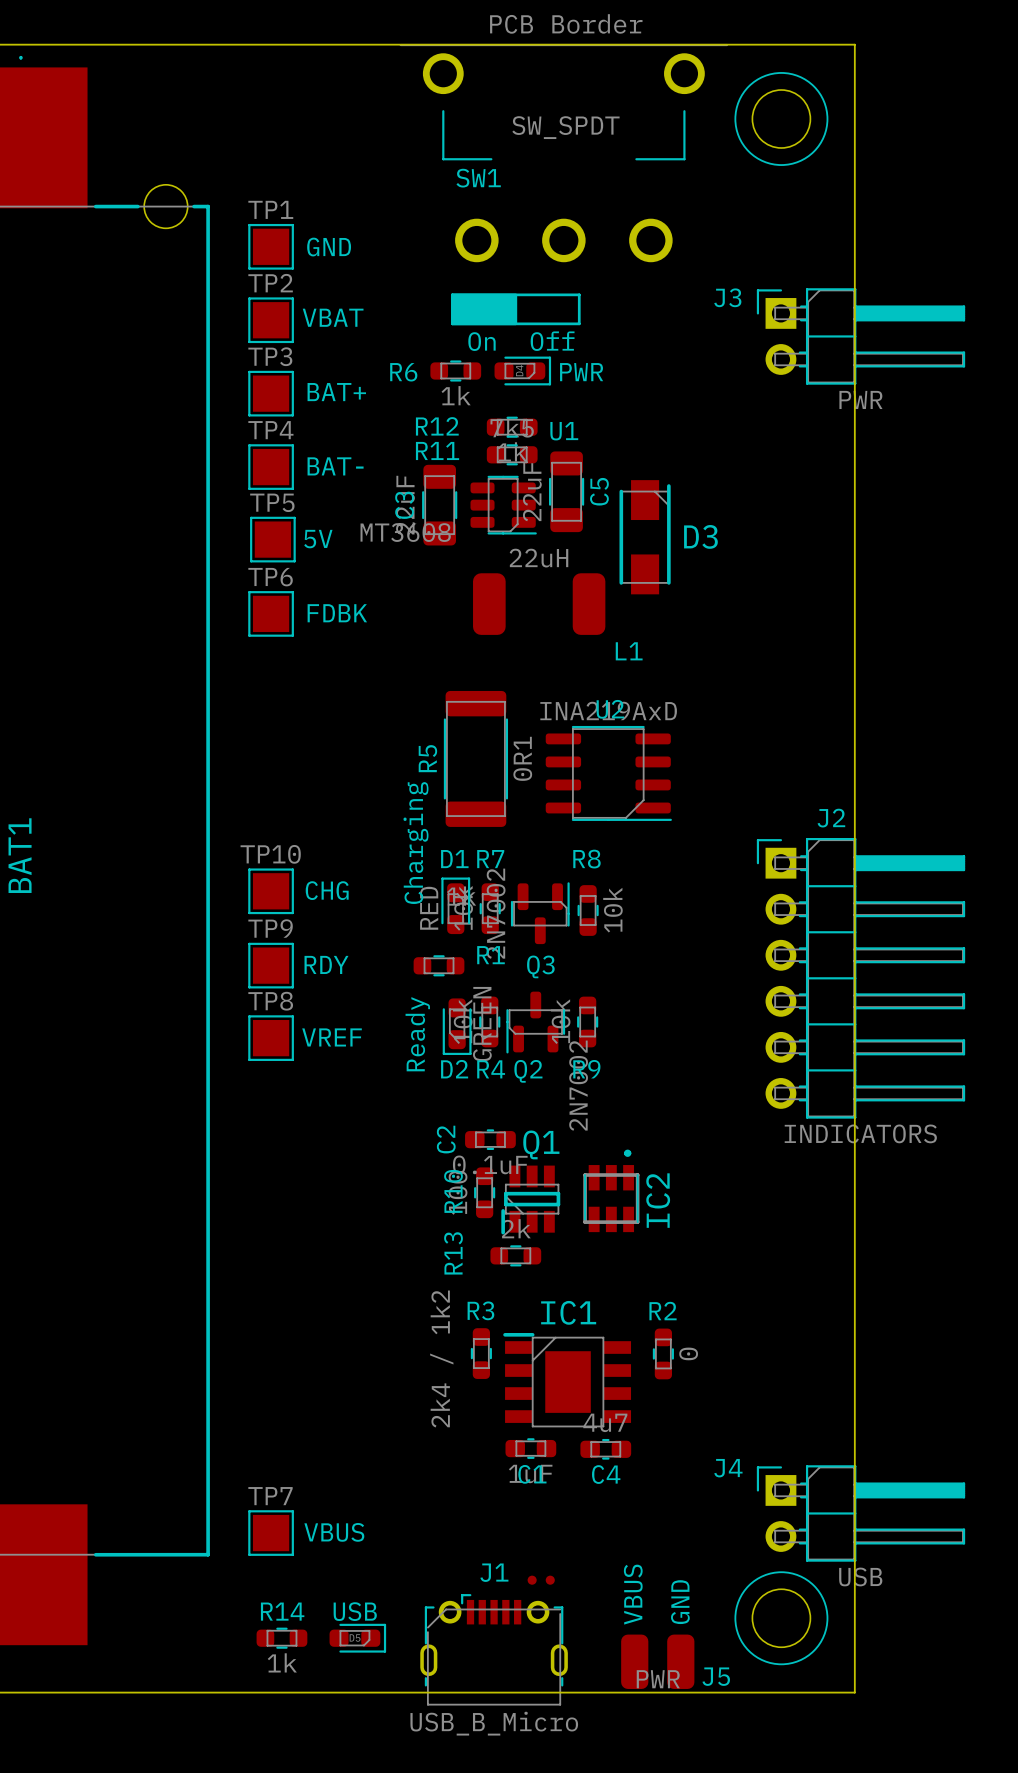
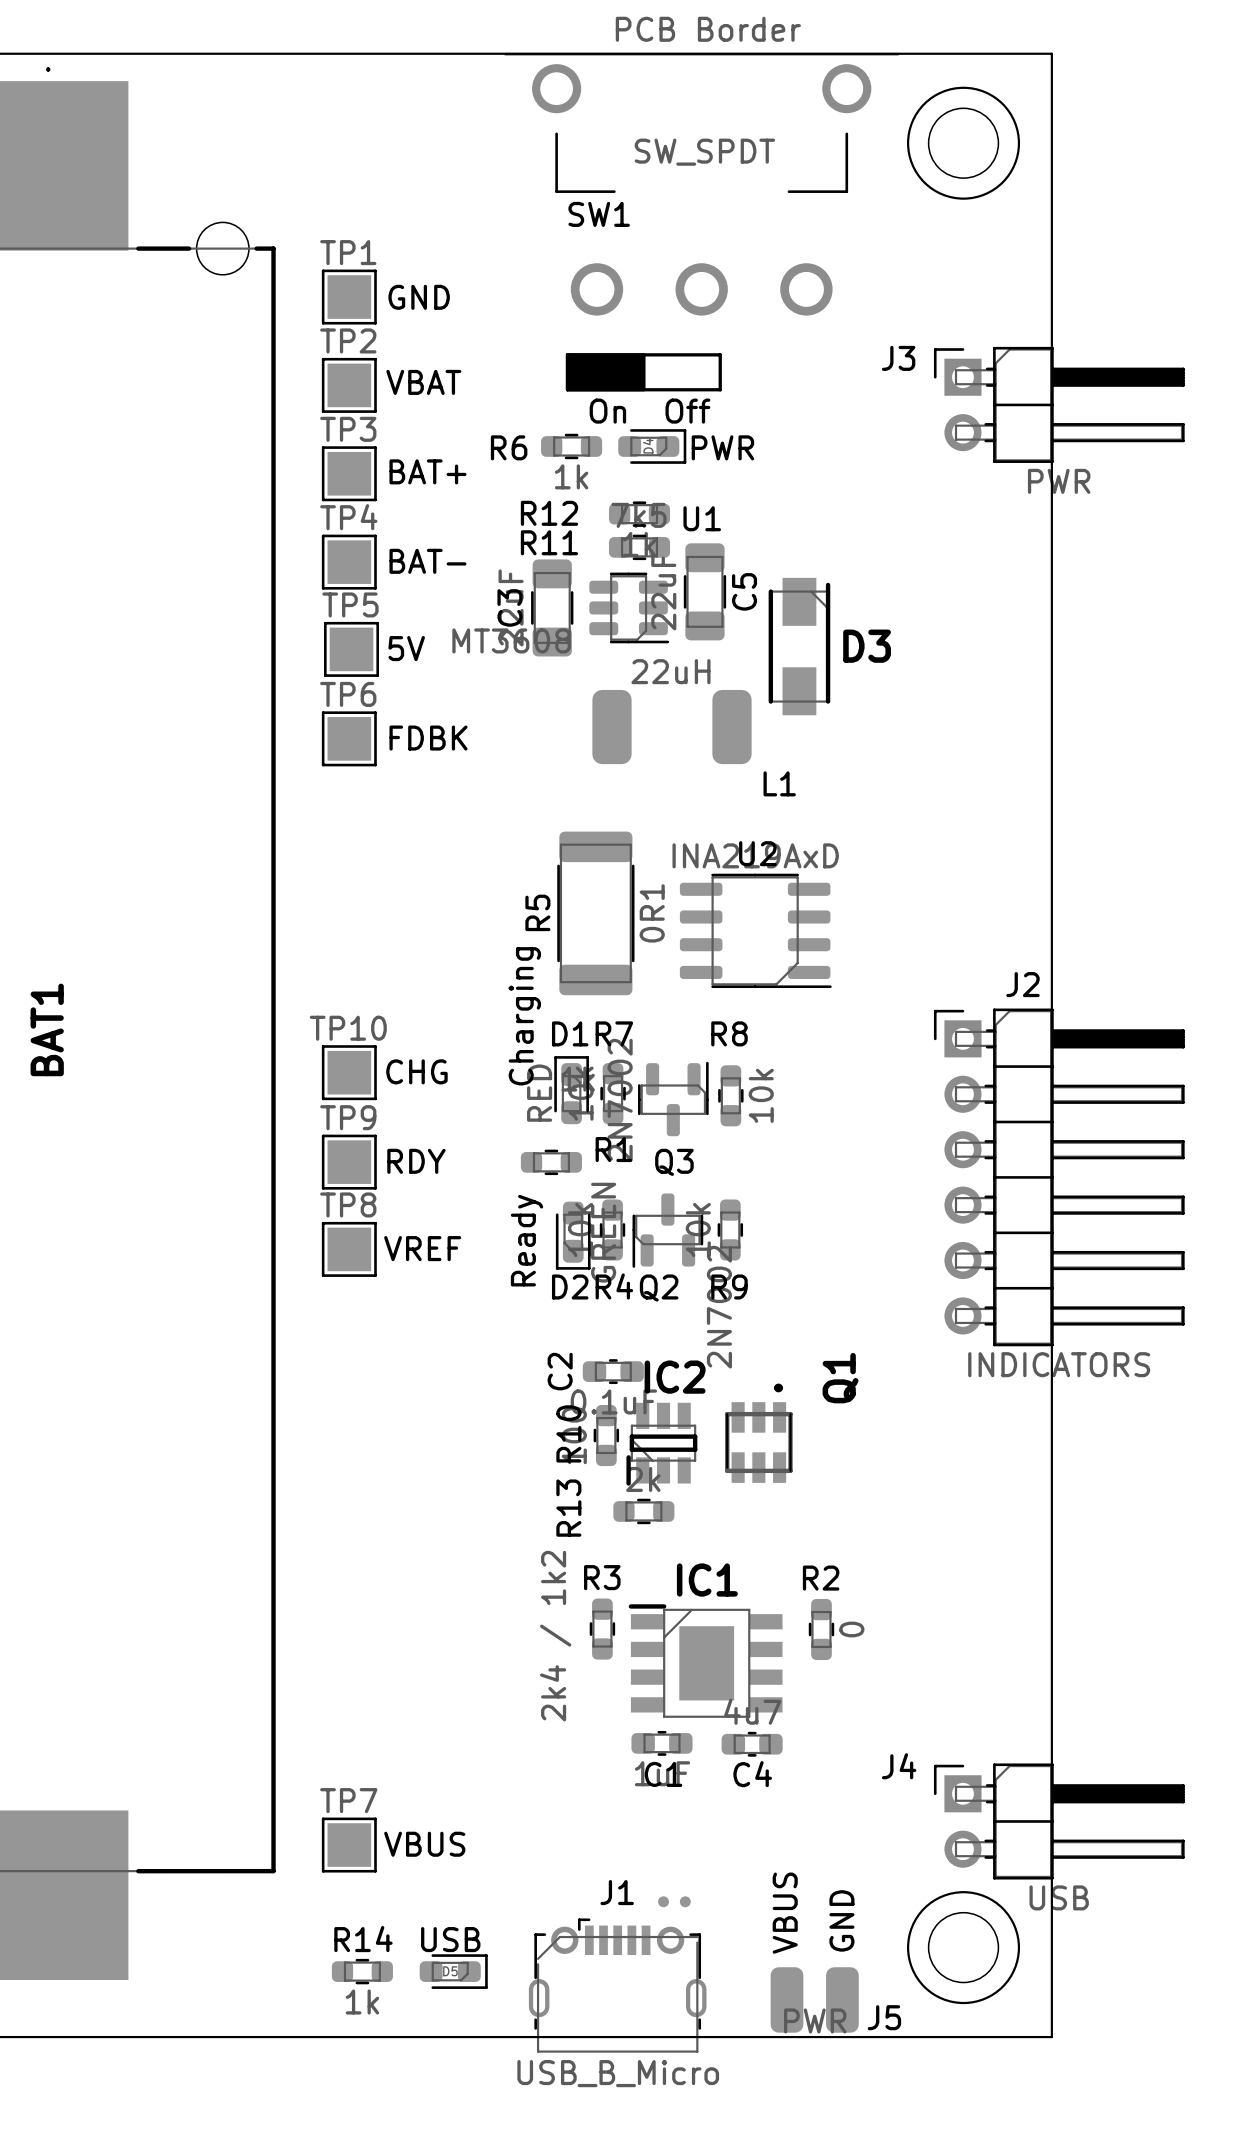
Q1 name rotation: 0° (541, 1144) -> 90° counterclockwise (840, 1378)
Q1 name position: Q1 (541, 1144) -> Q1 (840, 1378)
IC2 name rotation: 0° (658, 1200) -> 90° clockwise (675, 1377)
IC2 name position: IC2 (658, 1200) -> IC2 (675, 1377)

